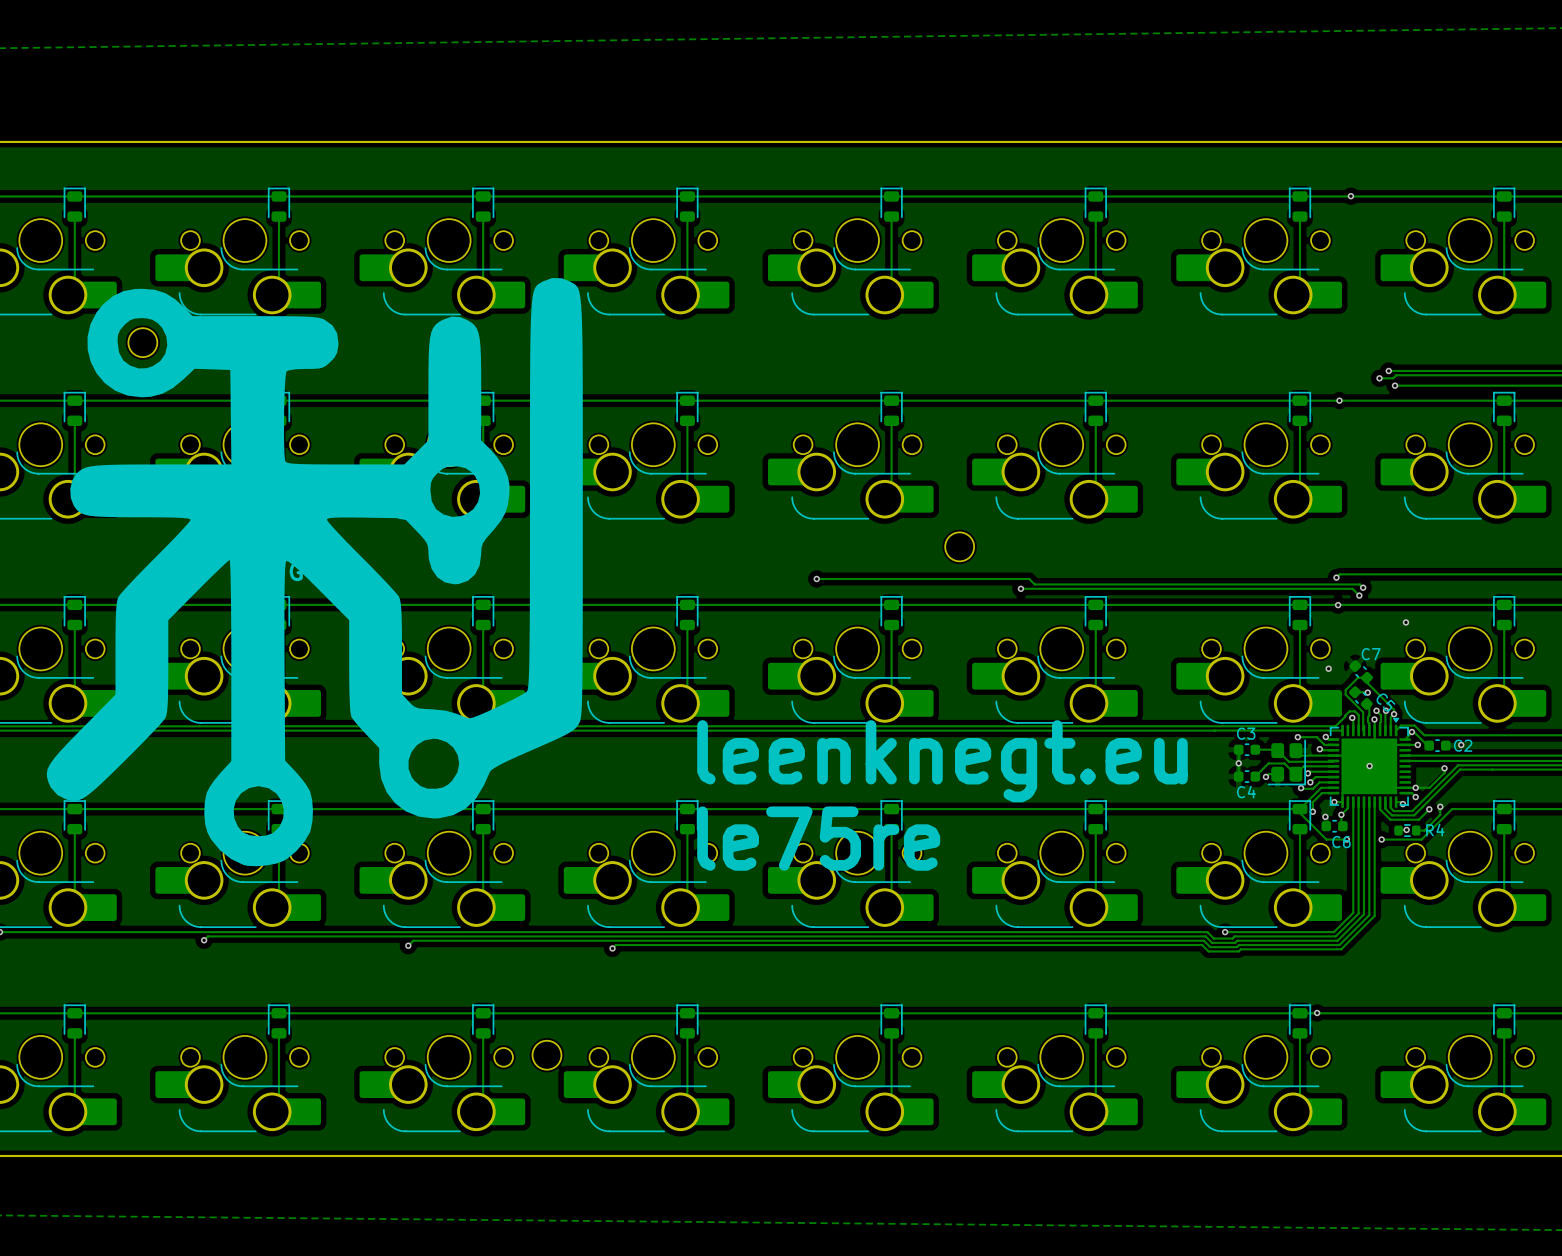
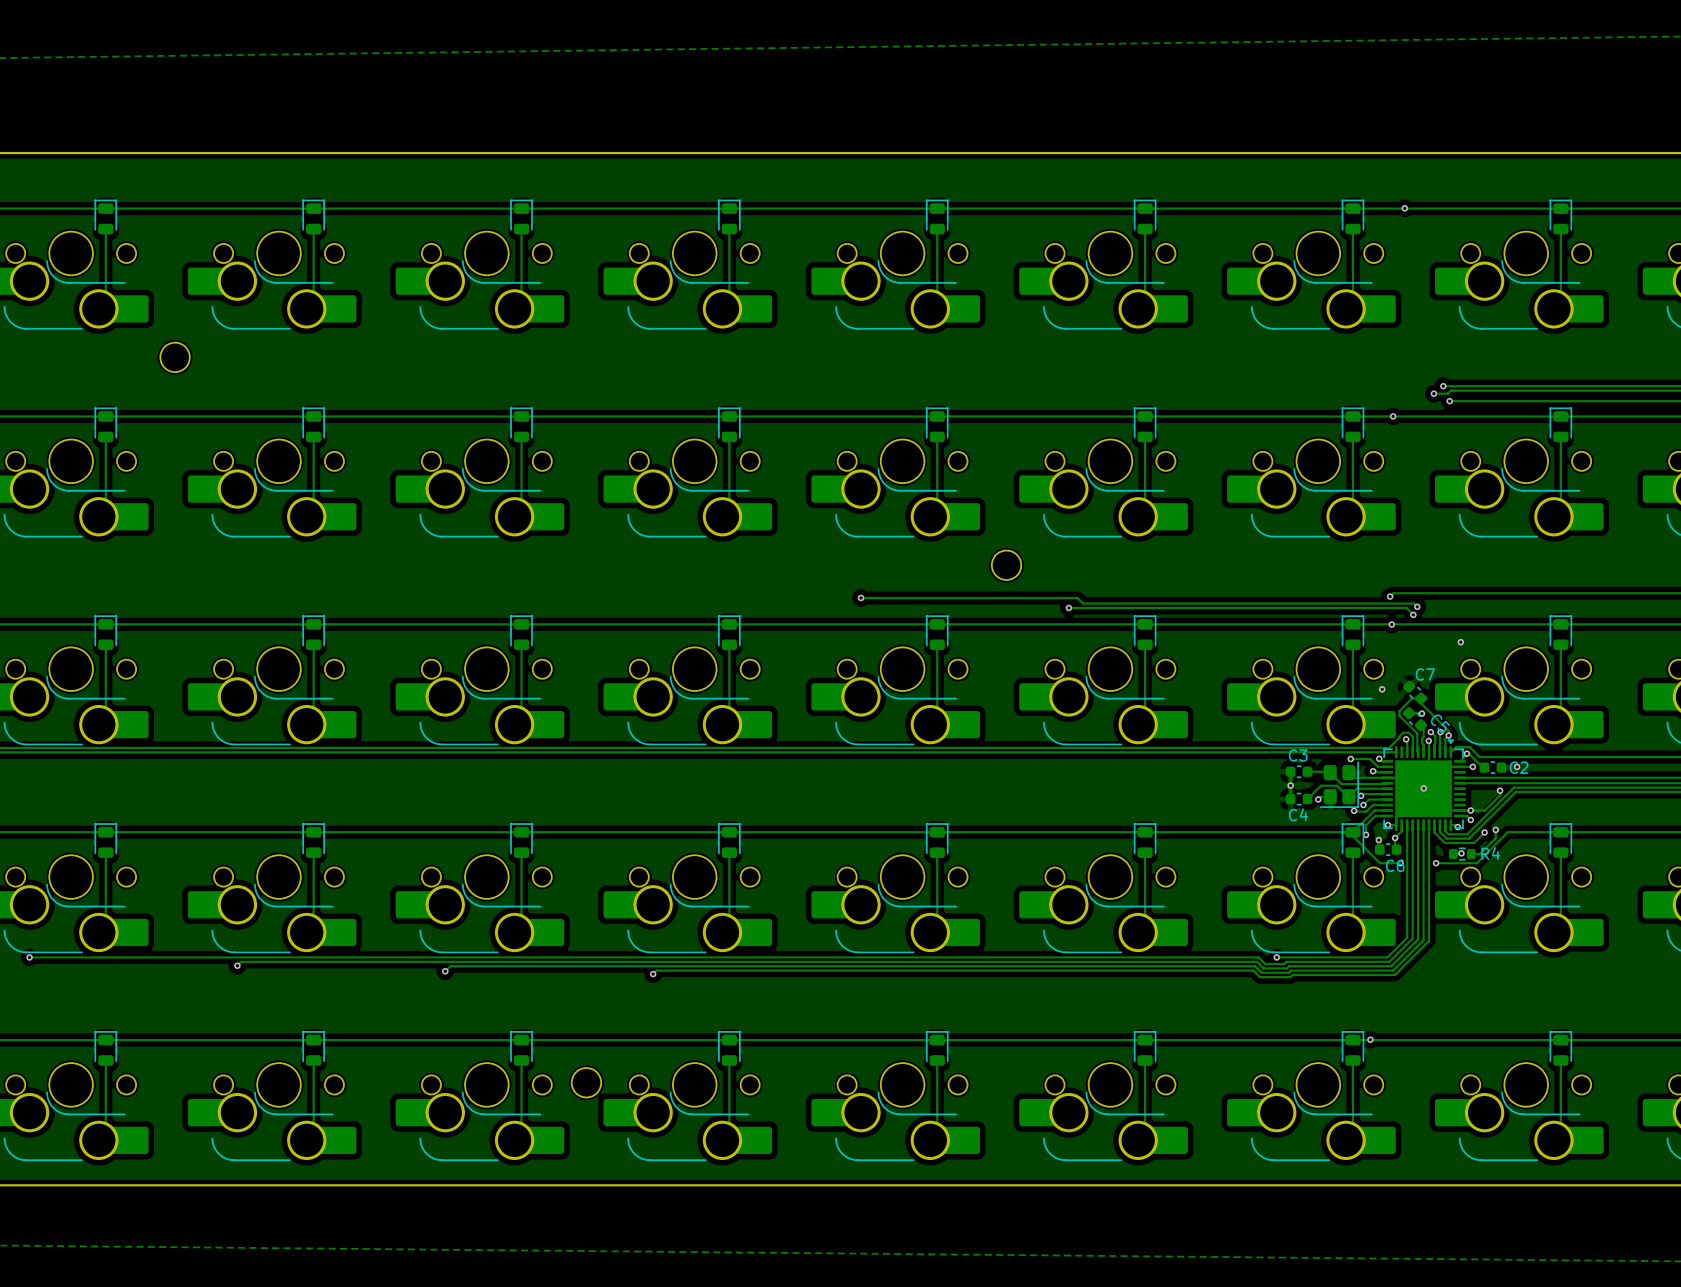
part: (314, 572) -> none
text: leenknegt.eu (942, 761) -> none
text: le75re (818, 838) -> none

